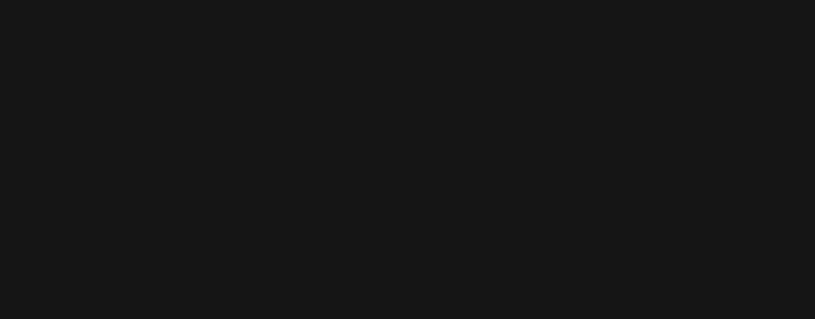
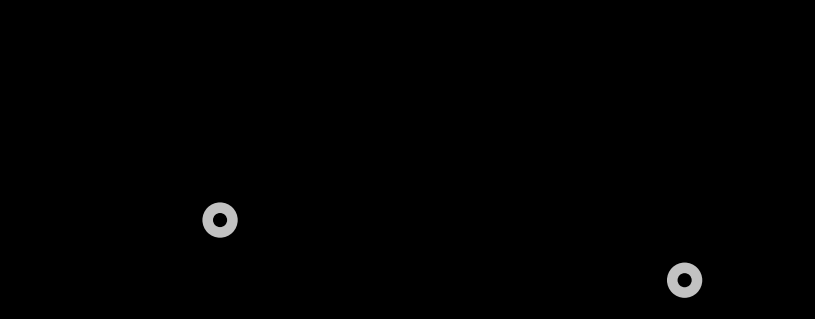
via: none -> (220, 220)
via: none -> (684, 280)

